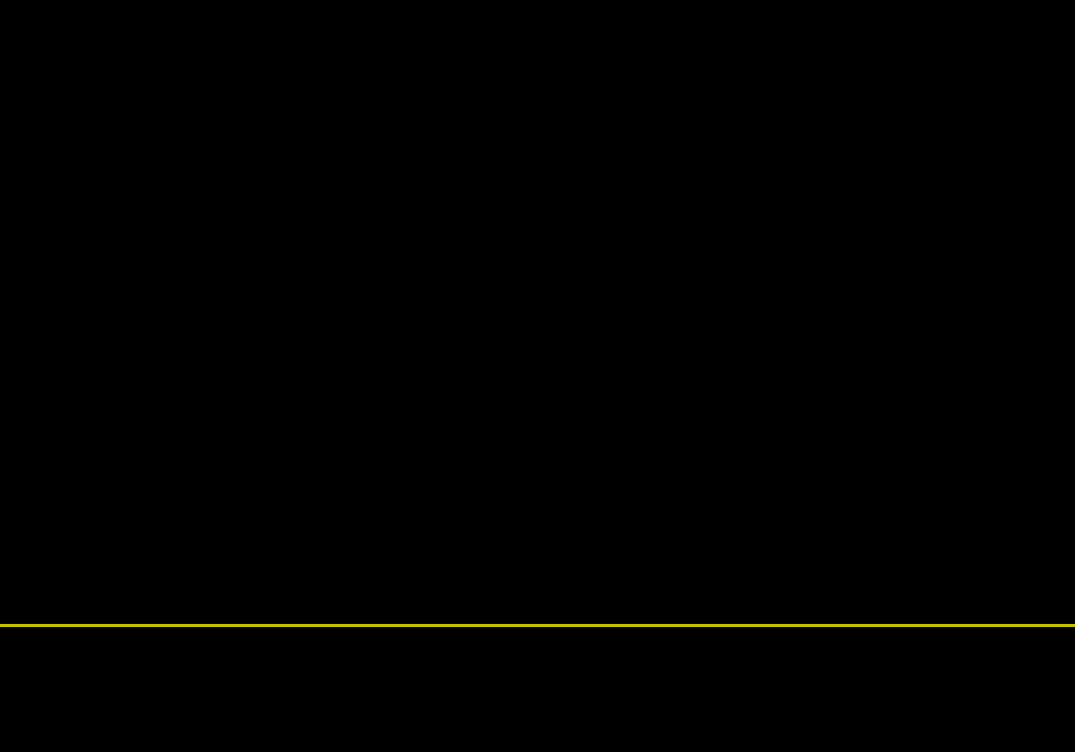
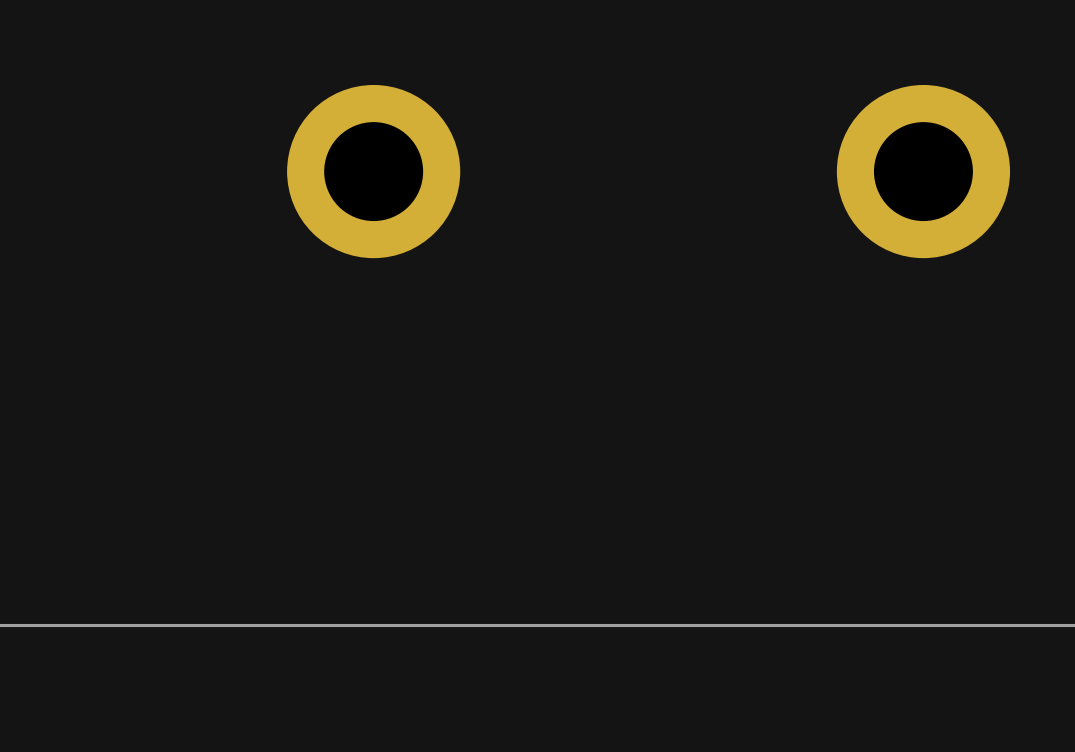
part: none -> (373, 171)
part: none -> (923, 171)

